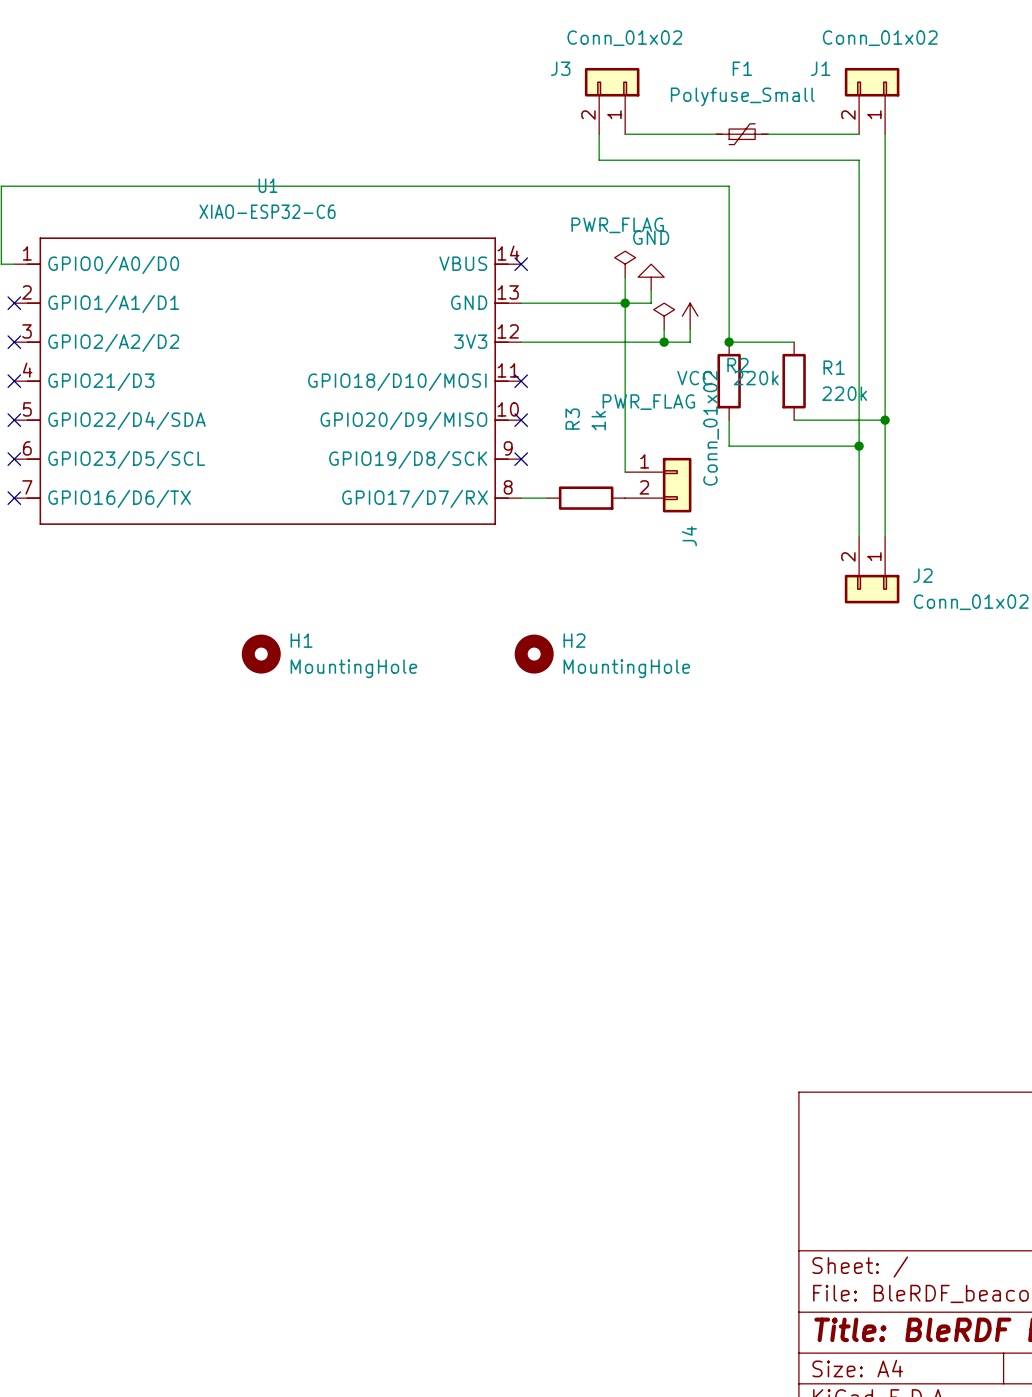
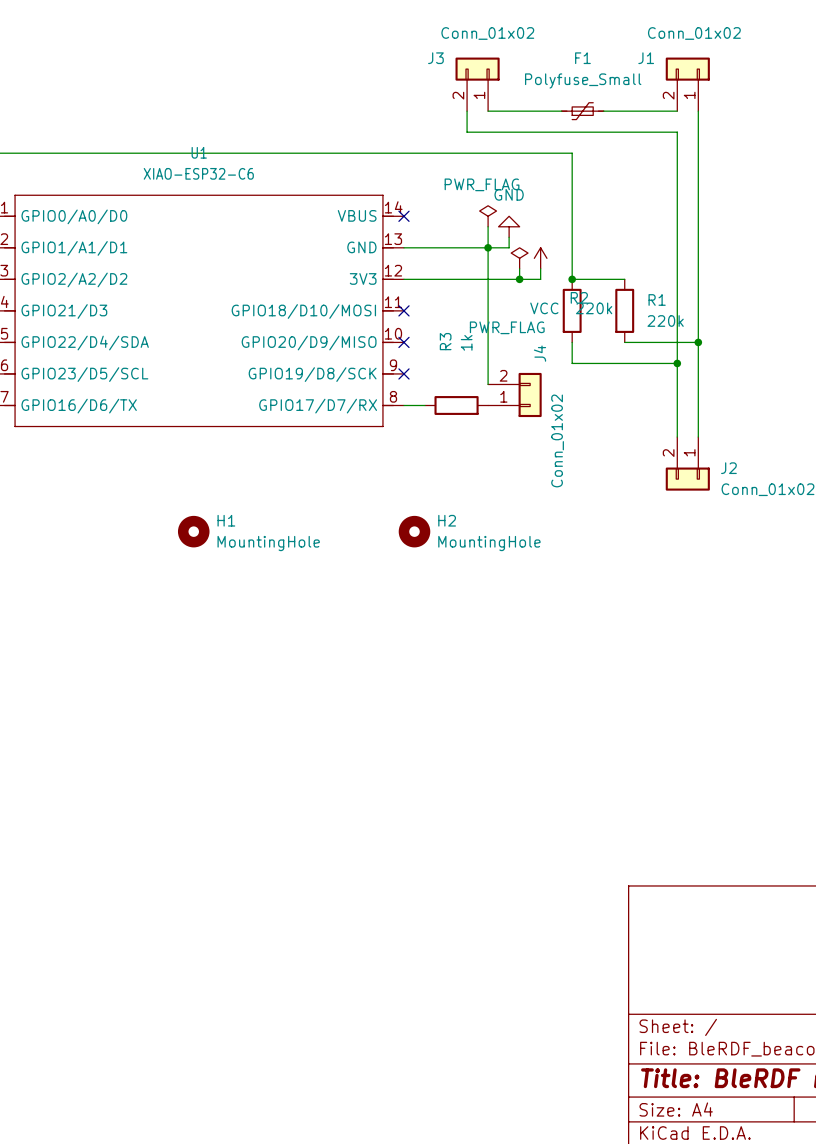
J4 flip: as is (677, 485) -> up-down (530, 394)

